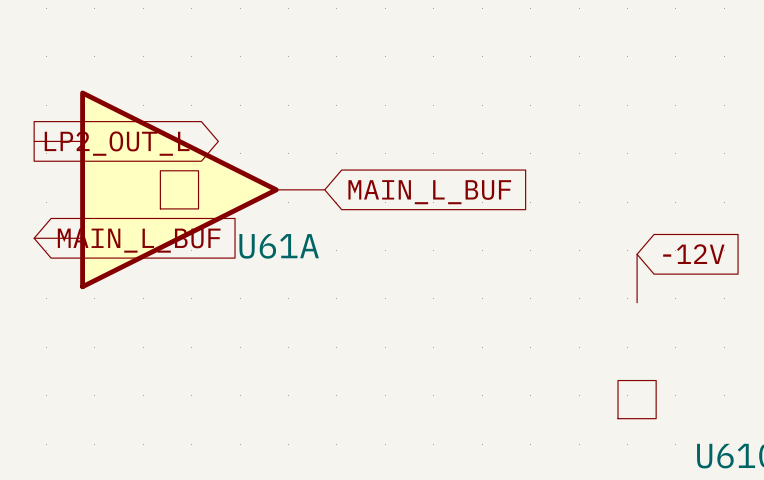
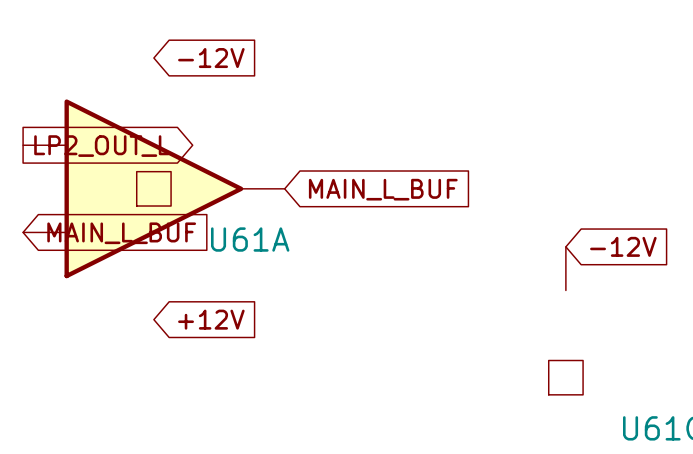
global label: none -> -12V (211, 58)
global label: none -> +12V (211, 319)

